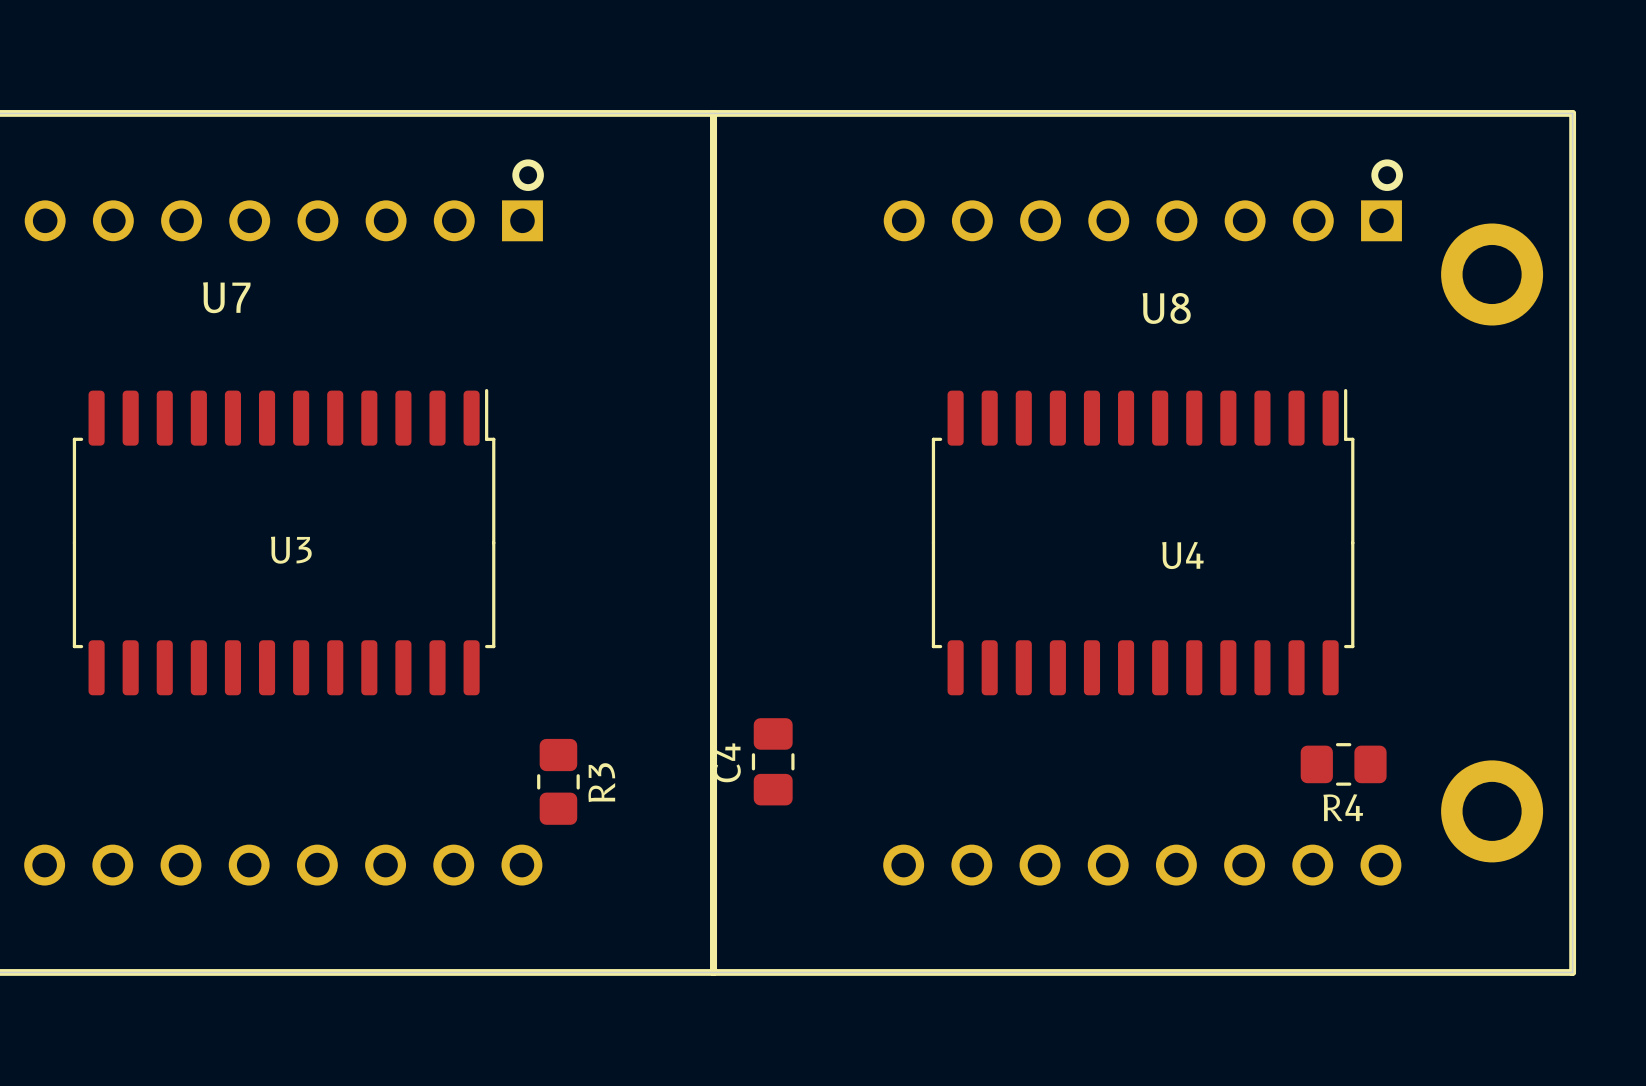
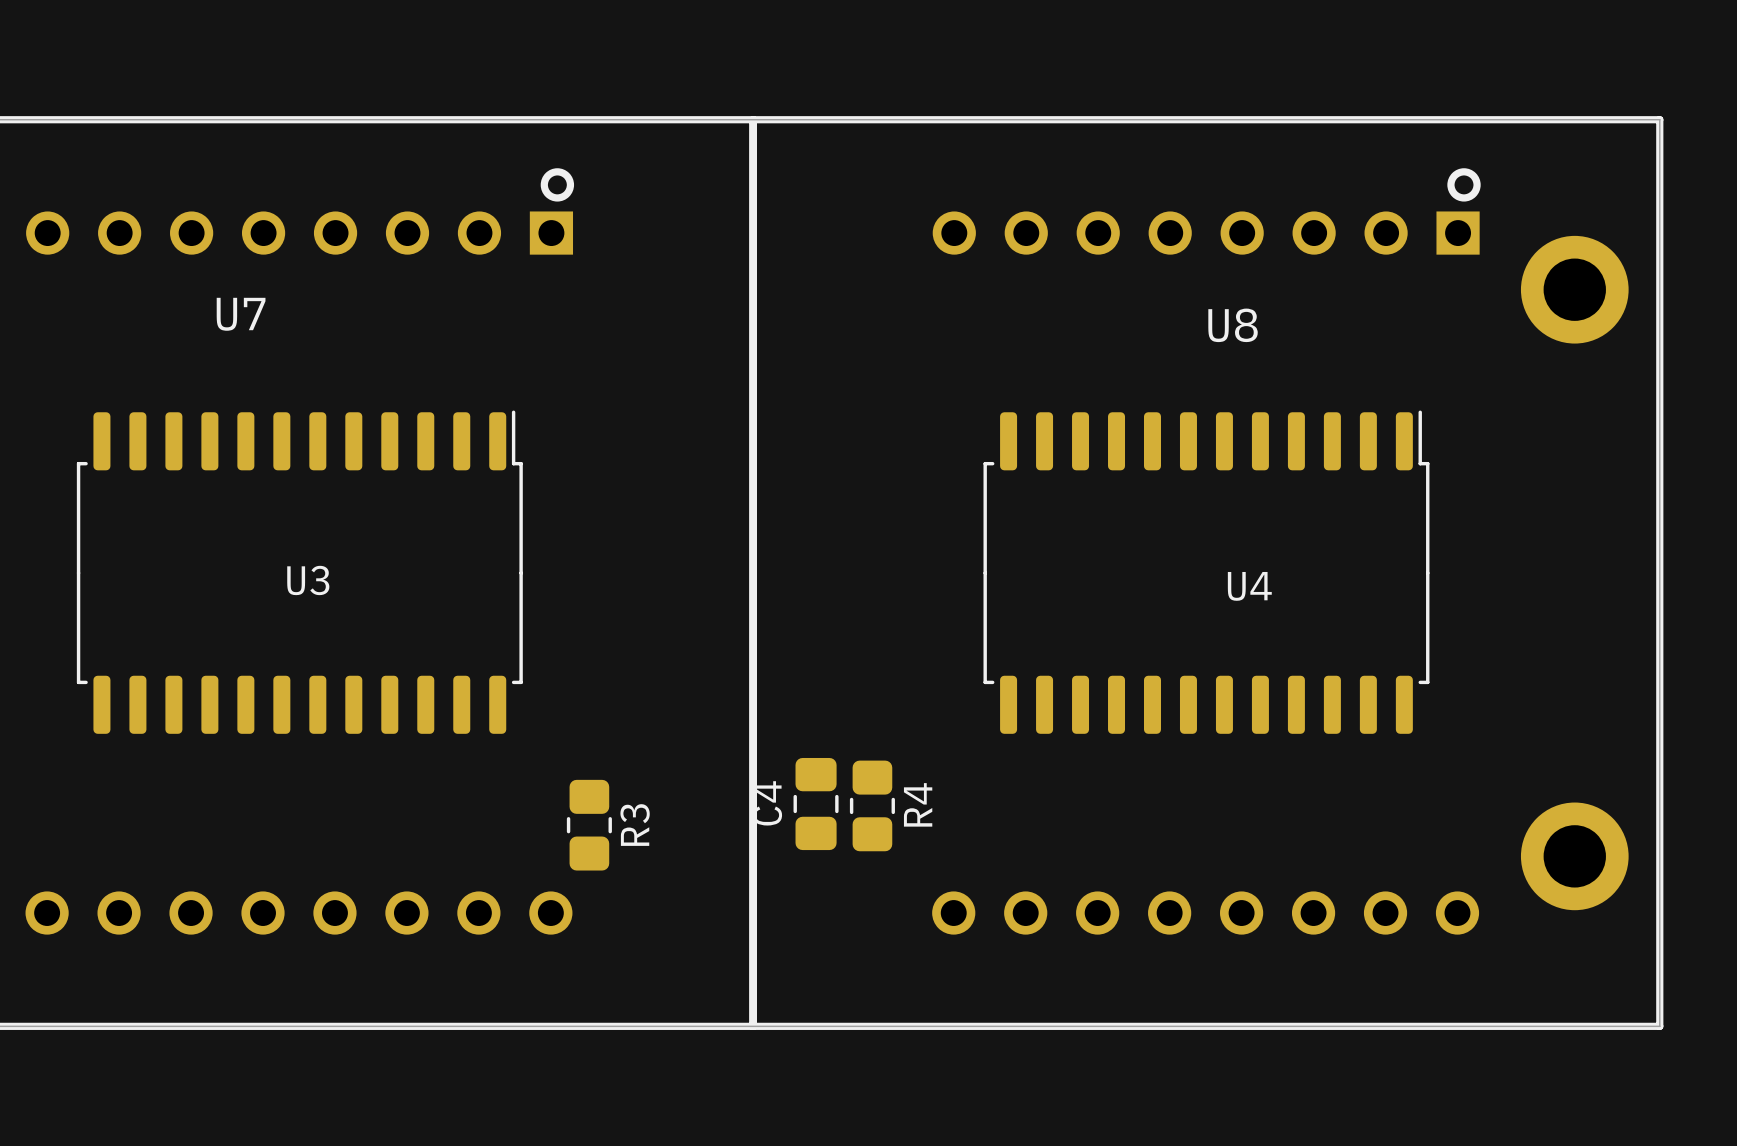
R4 rotation: 0° (1343, 764) -> 90° clockwise (872, 805)
R4 position: (1343, 764) -> (872, 805)
R4 name position: R4 (1343, 807) -> R4 (918, 804)

